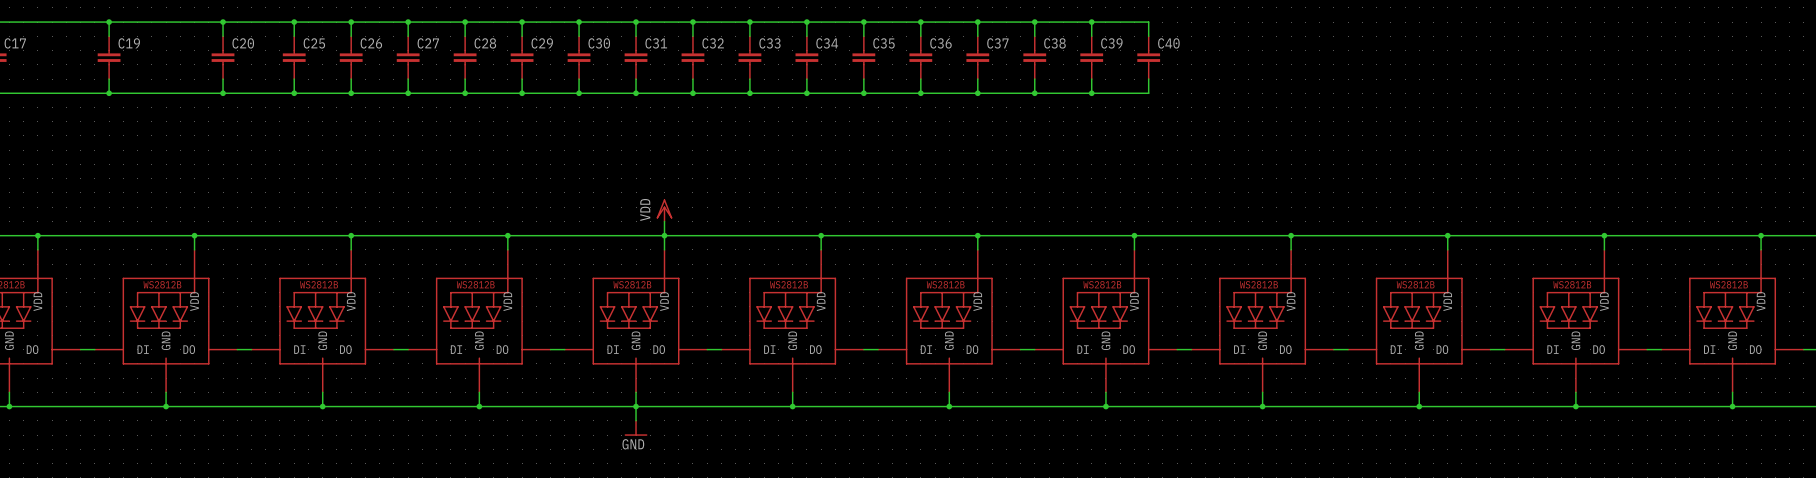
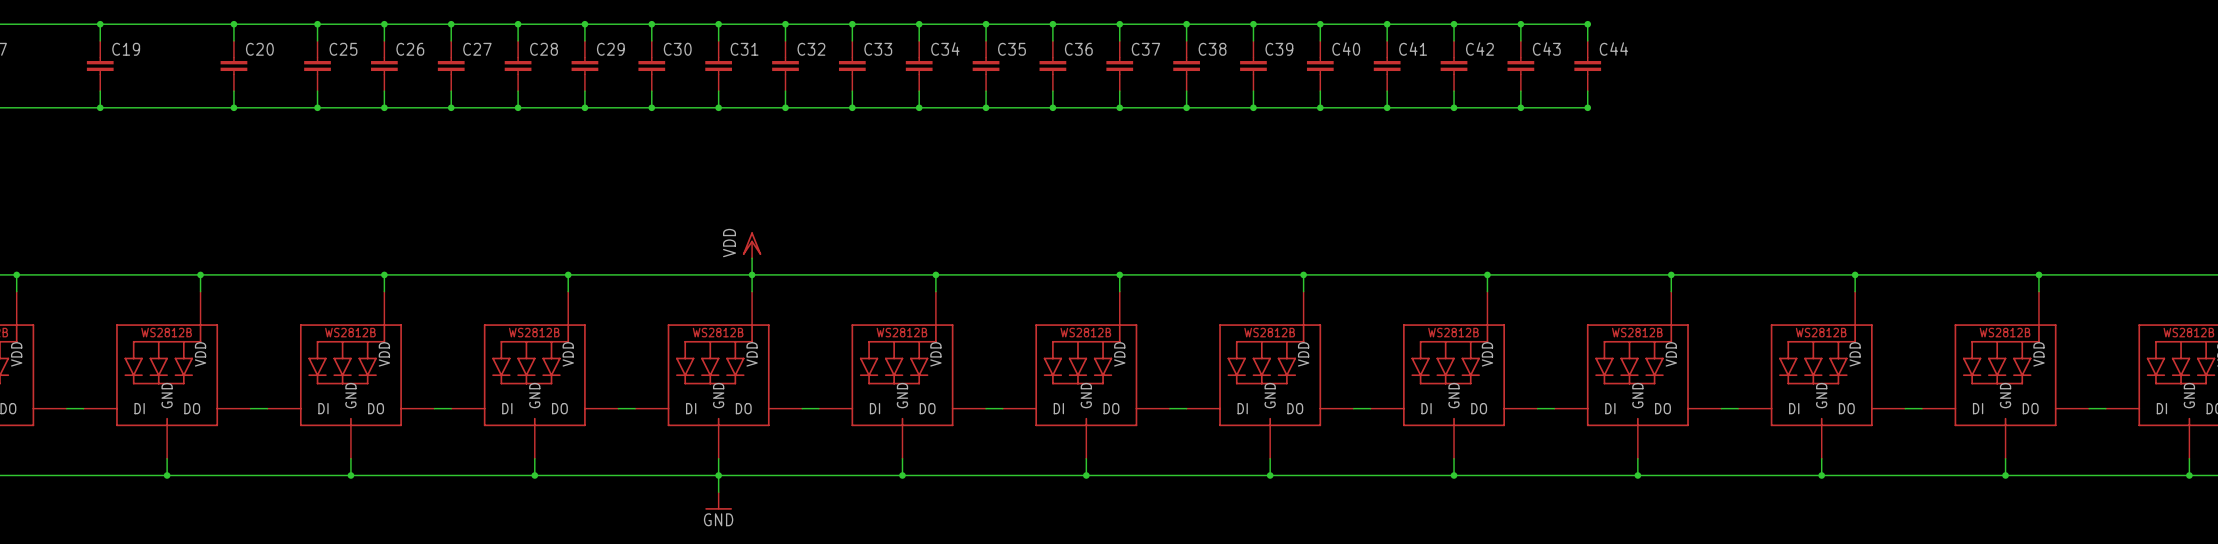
wire: none -> (1320, 24) (1587, 24) (1587, 40)
junction: none -> (1320, 24)
wire: none -> (1387, 24) (1387, 40)
junction: none -> (1387, 24)
wire: none -> (1454, 24) (1454, 40)
junction: none -> (1454, 24)
wire: none -> (1520, 24) (1520, 40)
junction: none -> (1520, 24)
junction: none -> (1587, 24)
C41: none -> (1387, 66)
C42: none -> (1454, 66)
C43: none -> (1520, 66)
C44: none -> (1587, 66)
wire: none -> (1387, 91) (1387, 107)
wire: none -> (1454, 91) (1454, 107)
wire: none -> (1520, 91) (1520, 107)
wire: none -> (1587, 91) (1587, 107) (1320, 107)
junction: none -> (1320, 107)
junction: none -> (1387, 107)
junction: none -> (1454, 107)
junction: none -> (1520, 107)
junction: none -> (1587, 107)

